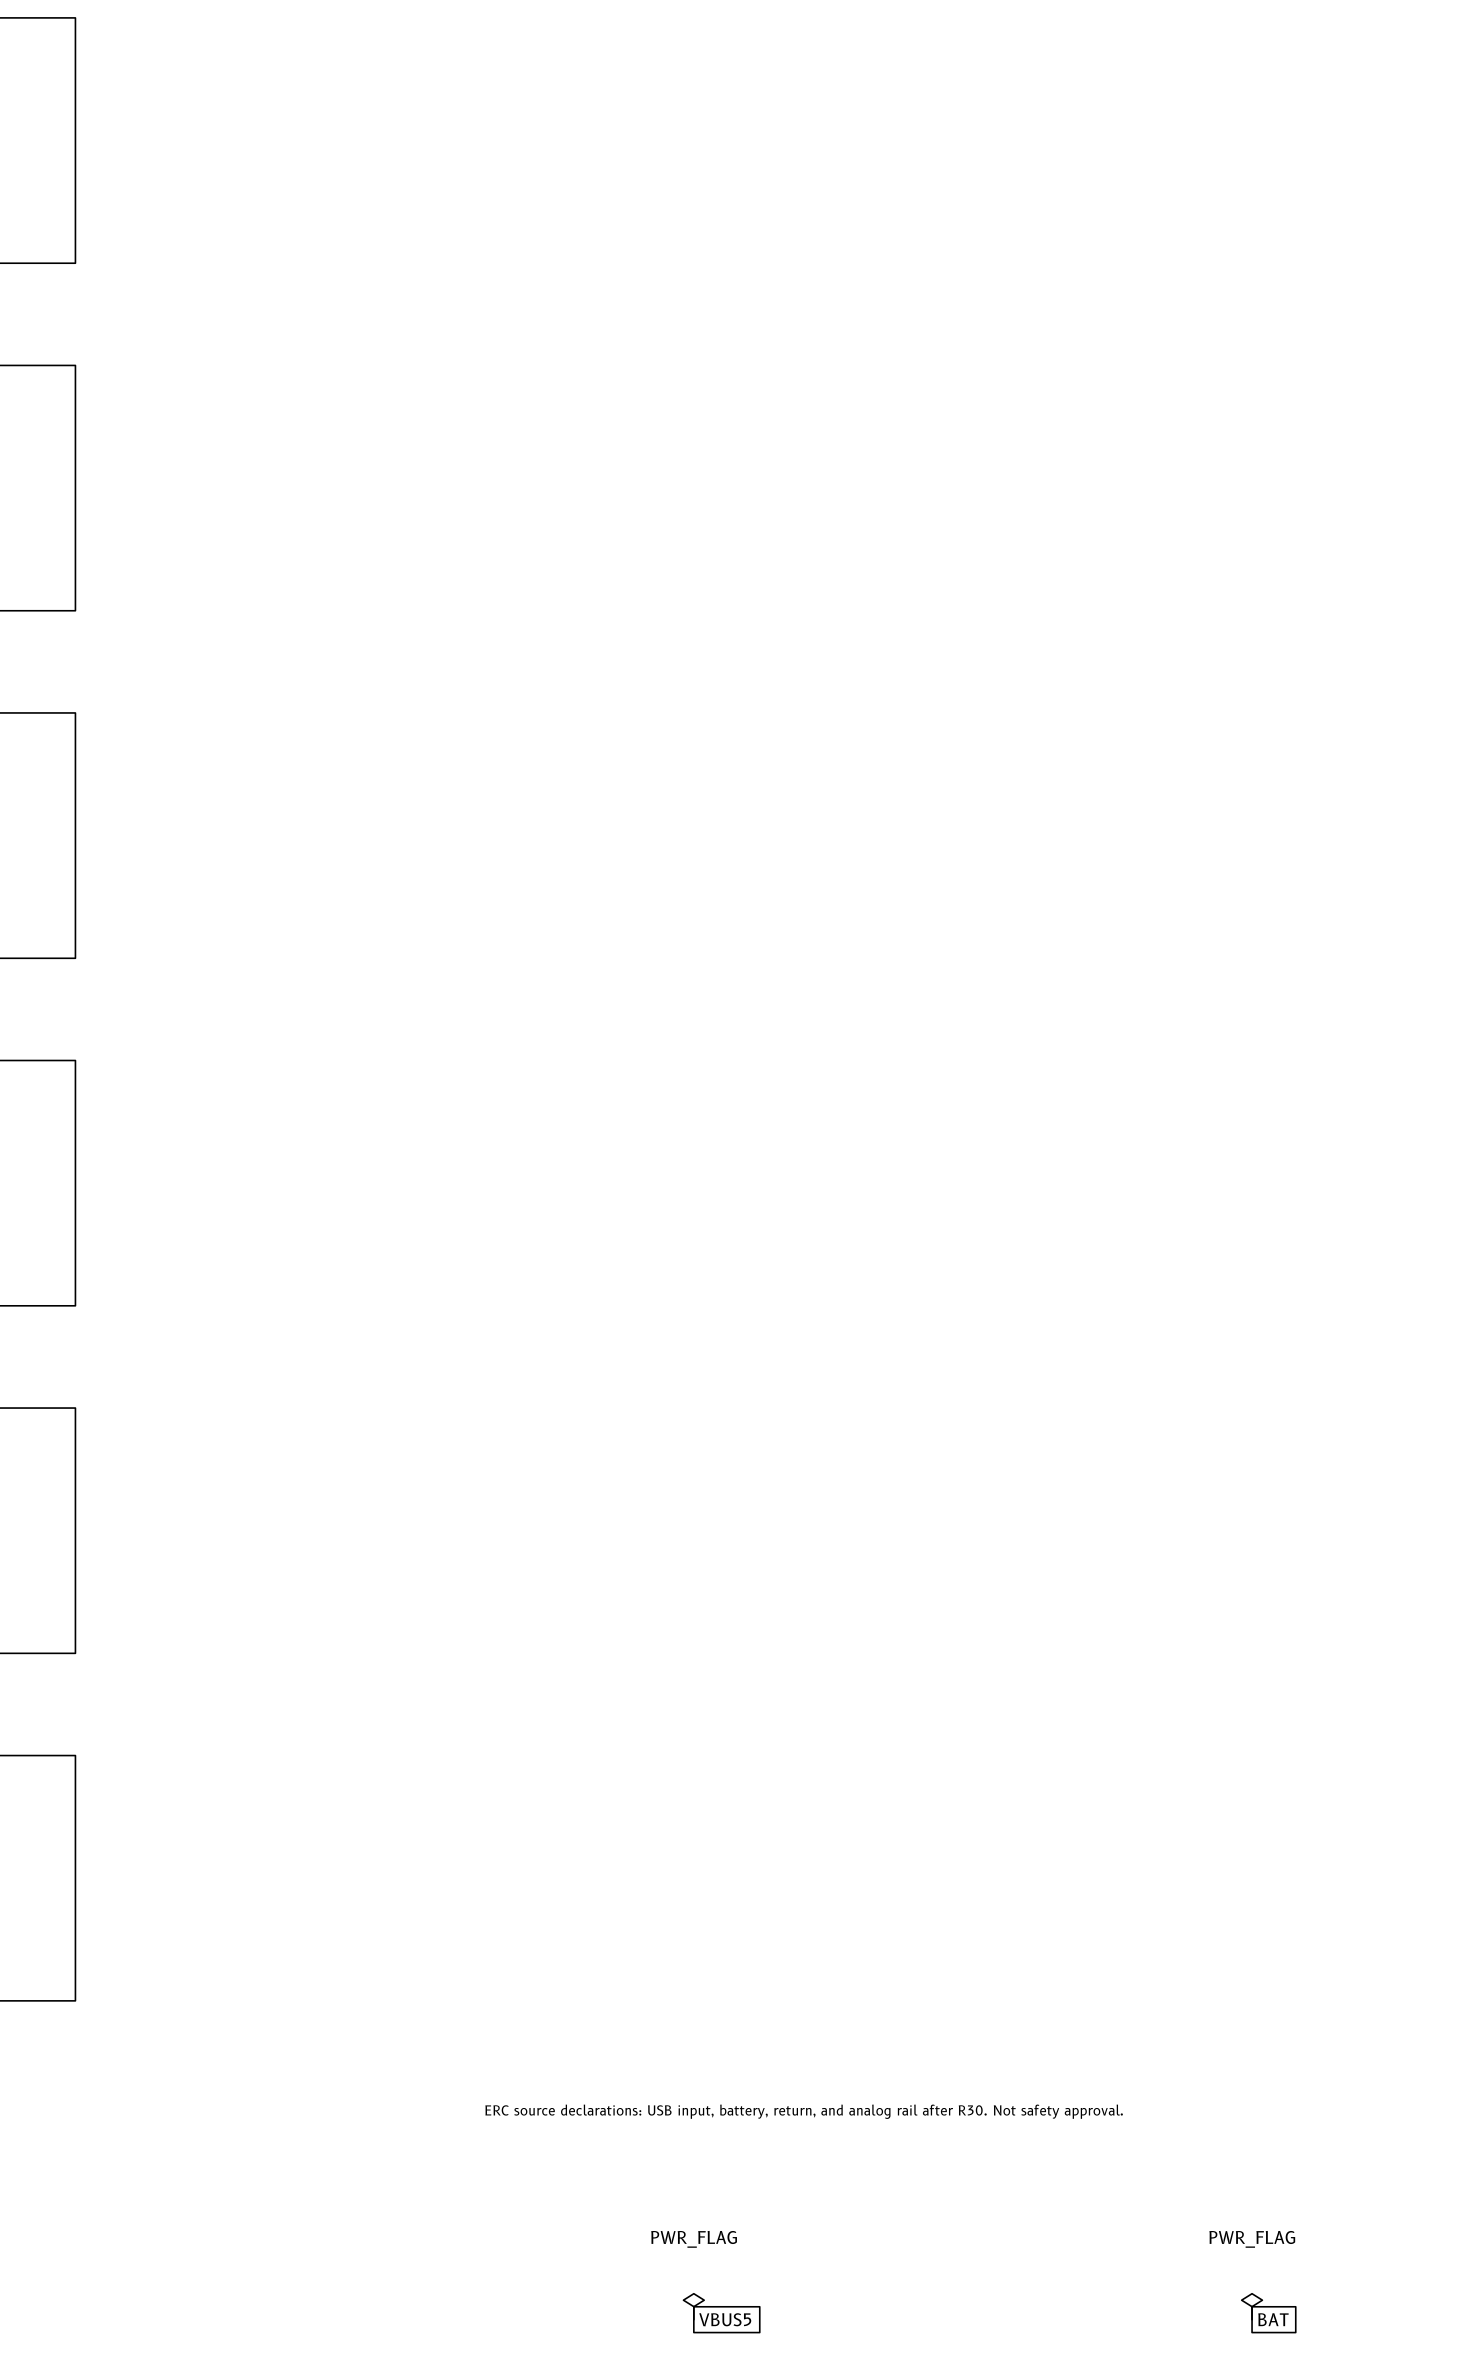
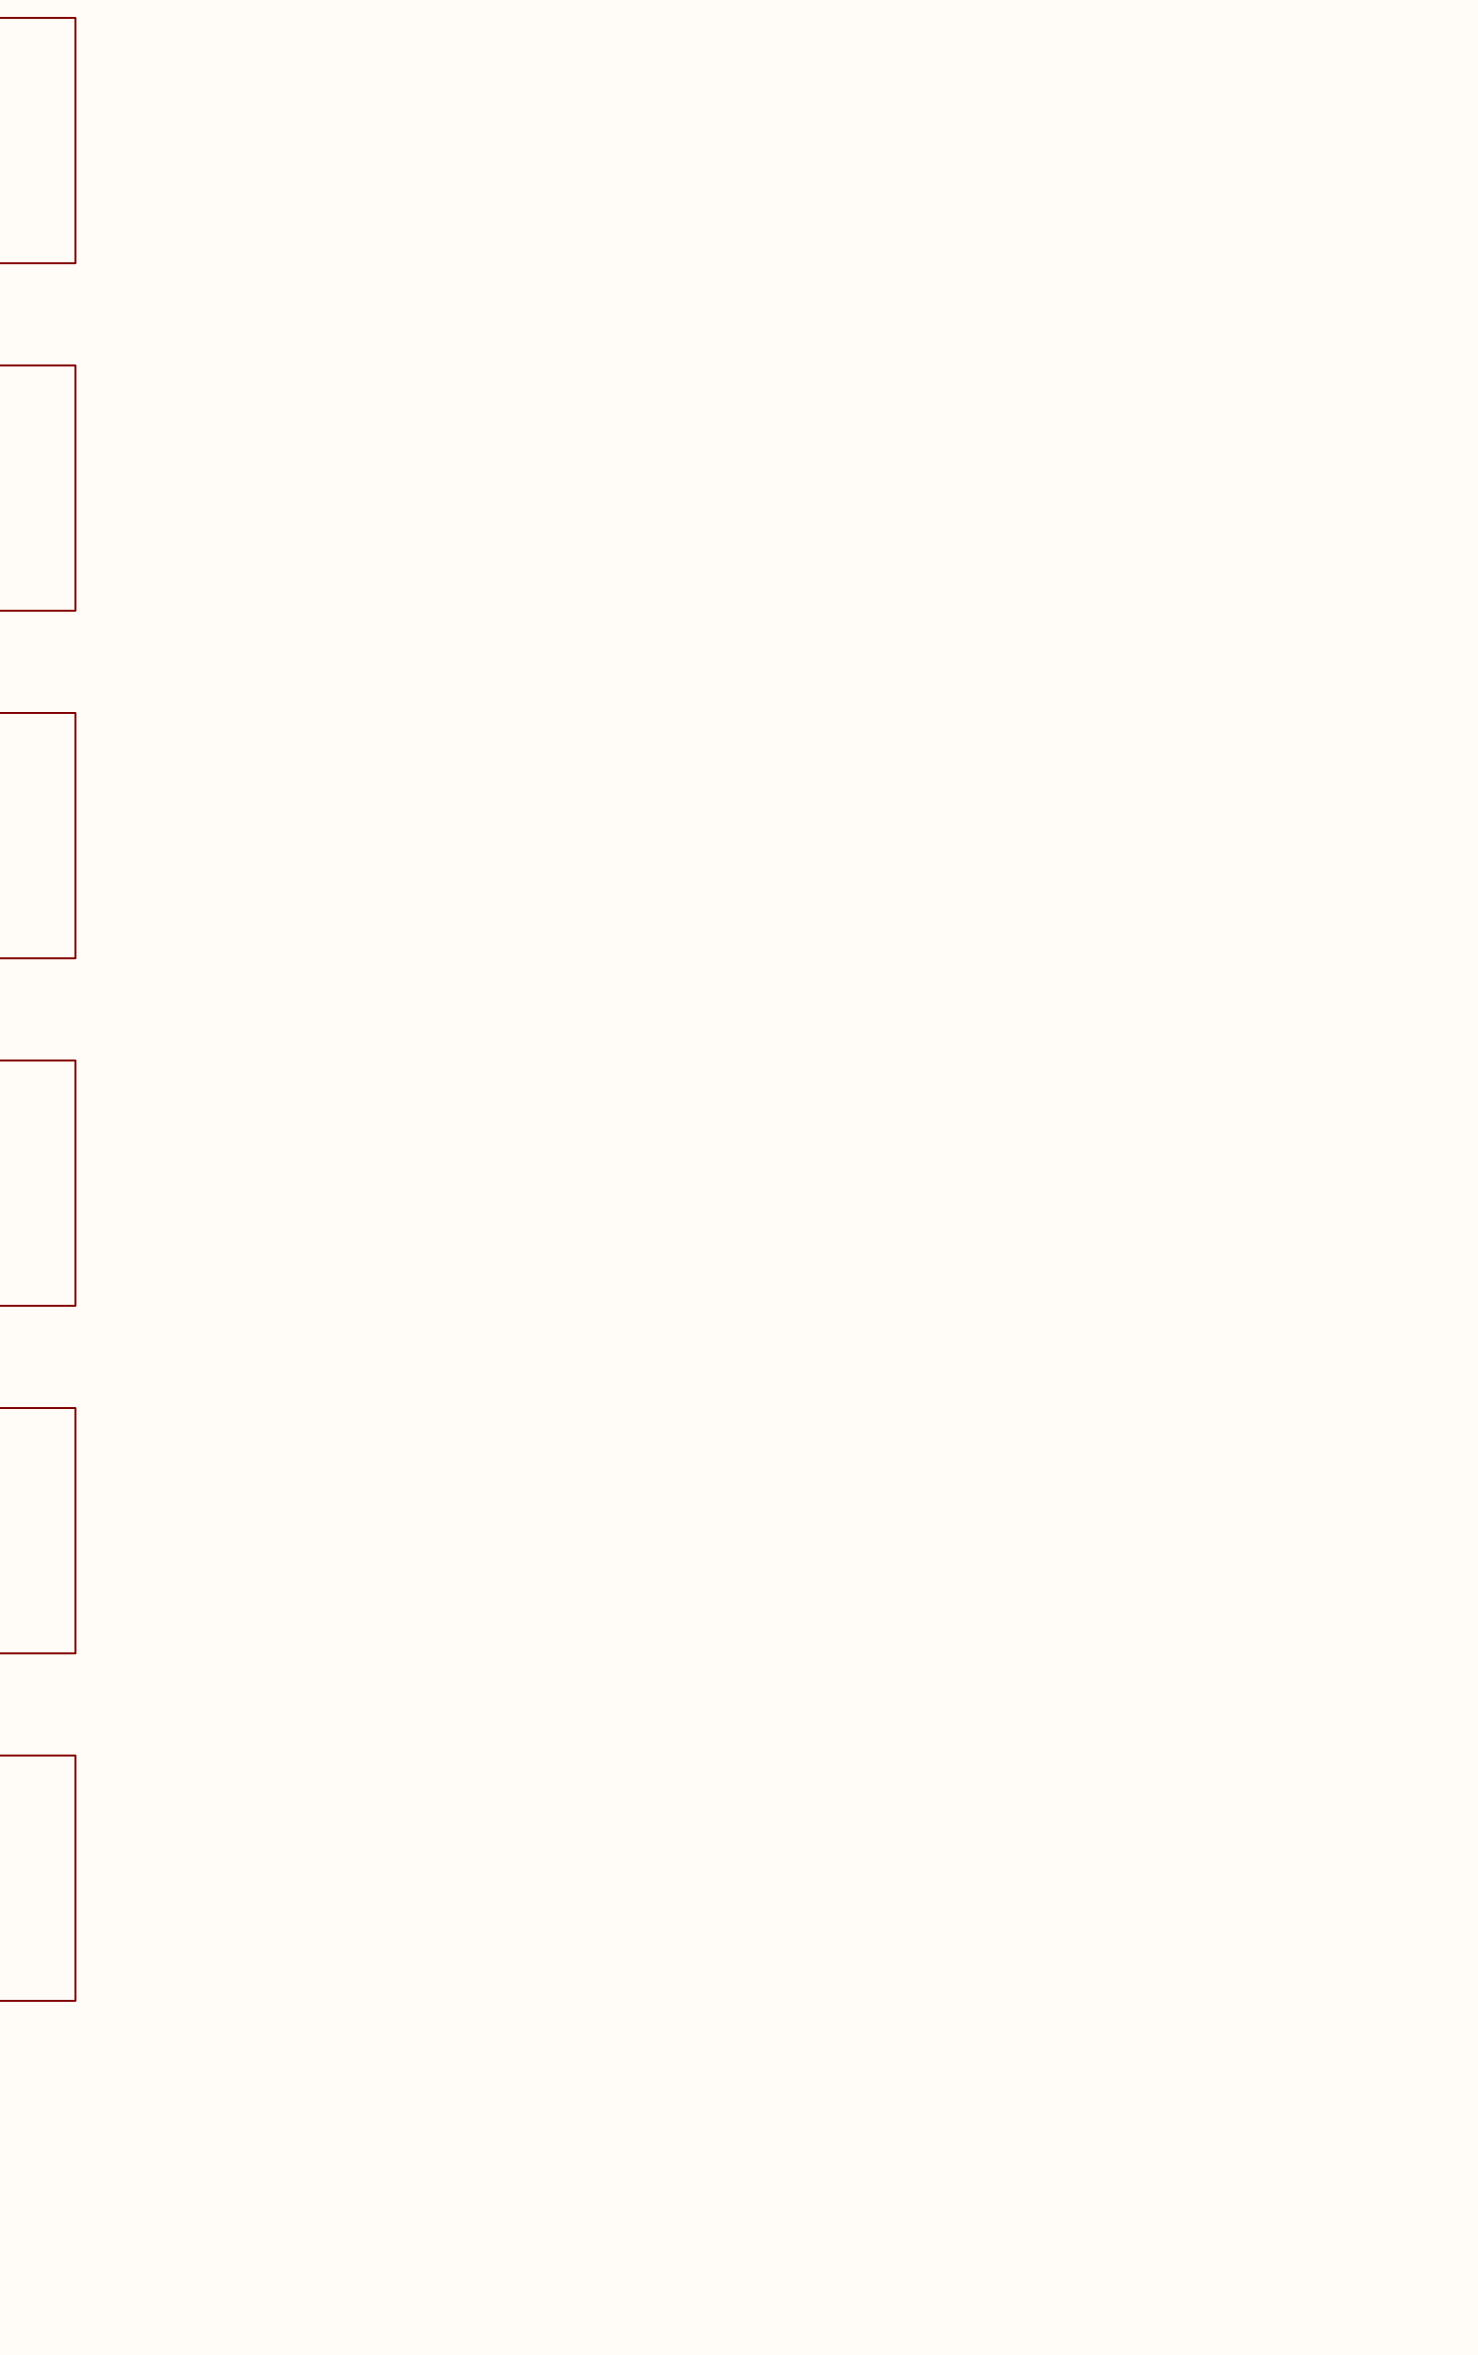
text: ERC source declarations: USB input, battery, return, and analog rail after R30. Not safety approval. (804, 2111) -> none
power symbol: PWR_FLAG (693, 2306) -> none
power symbol: PWR_FLAG (1252, 2306) -> none
global label: VBUS5 (725, 2319) -> none
global label: BAT (1273, 2319) -> none

